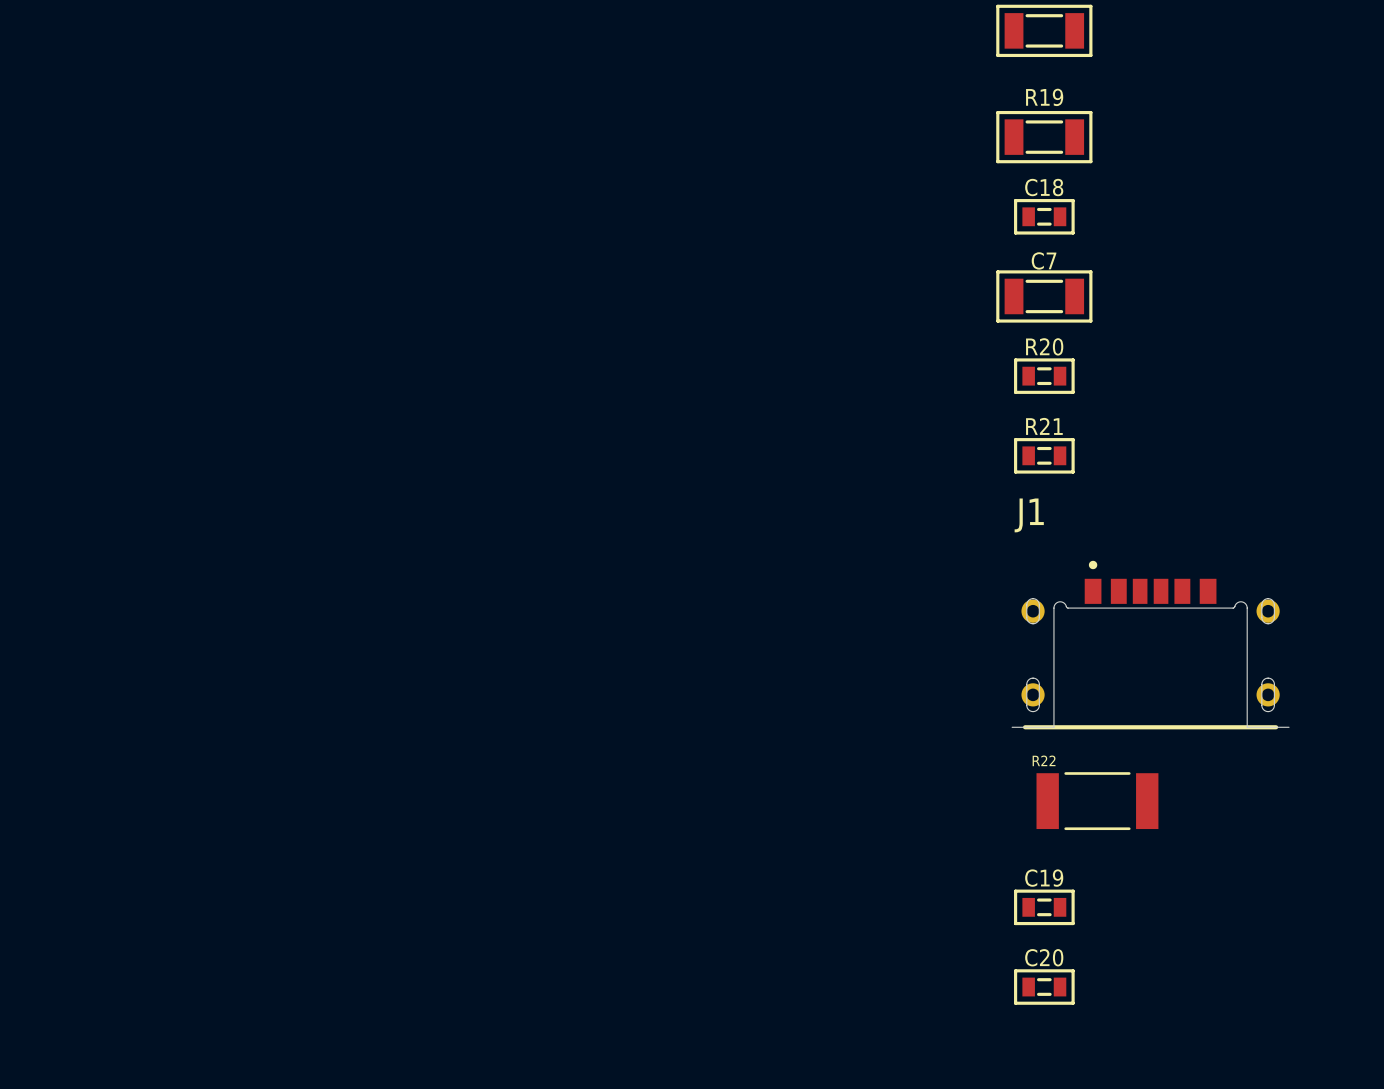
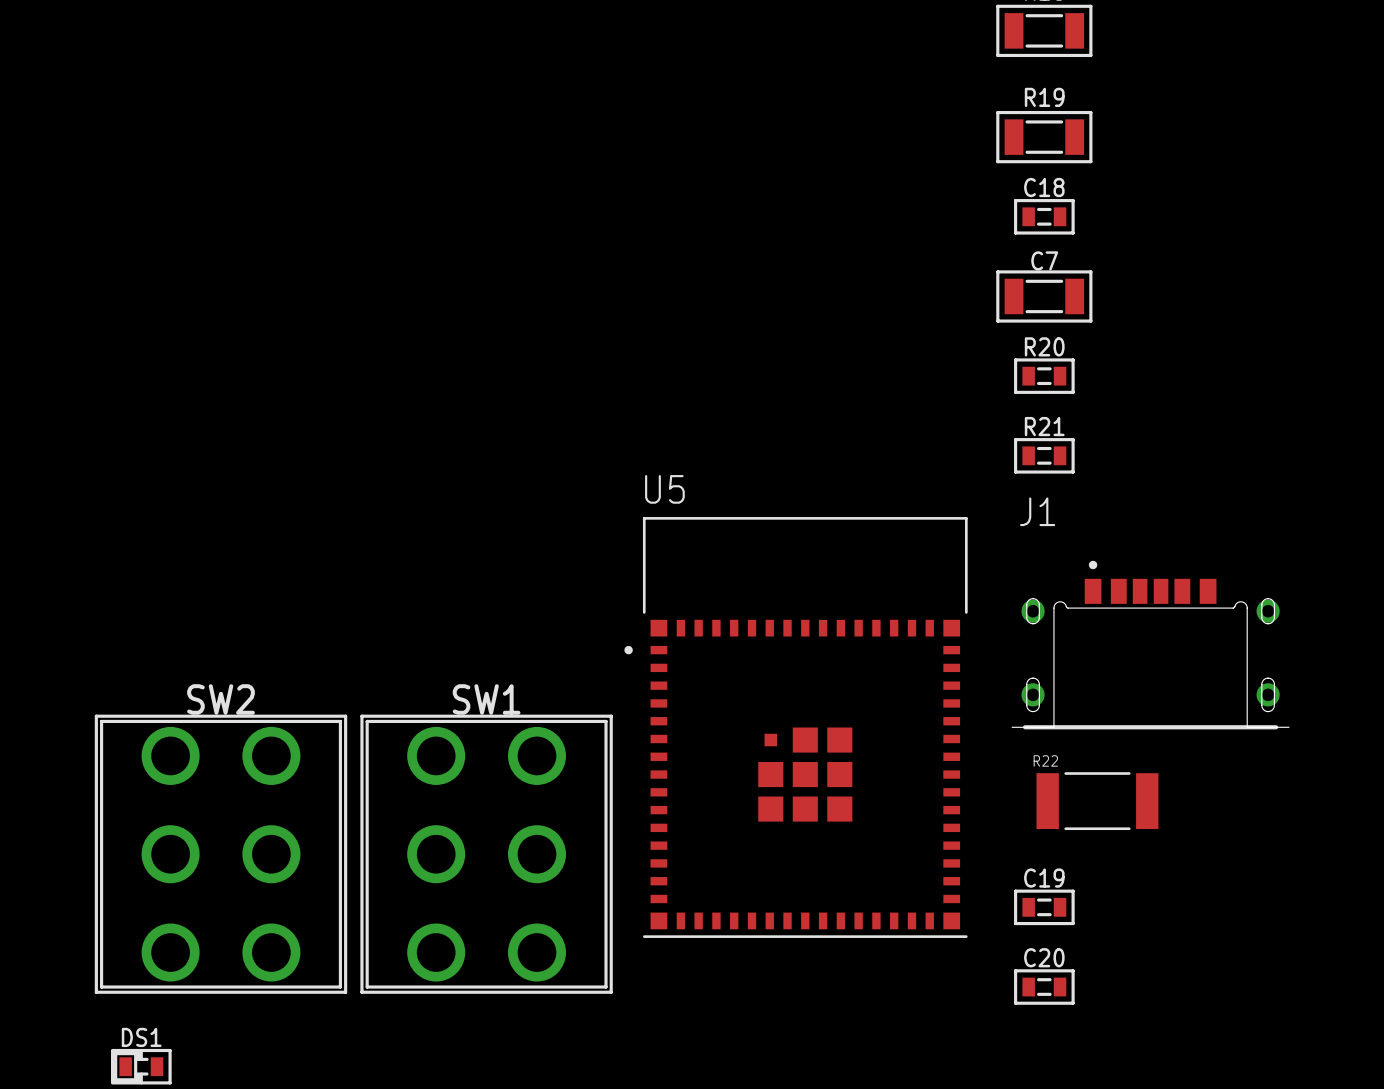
U5: none -> (796, 727)
SW2: none -> (220, 854)
SW1: none -> (486, 854)
DS1: none -> (141, 1066)

